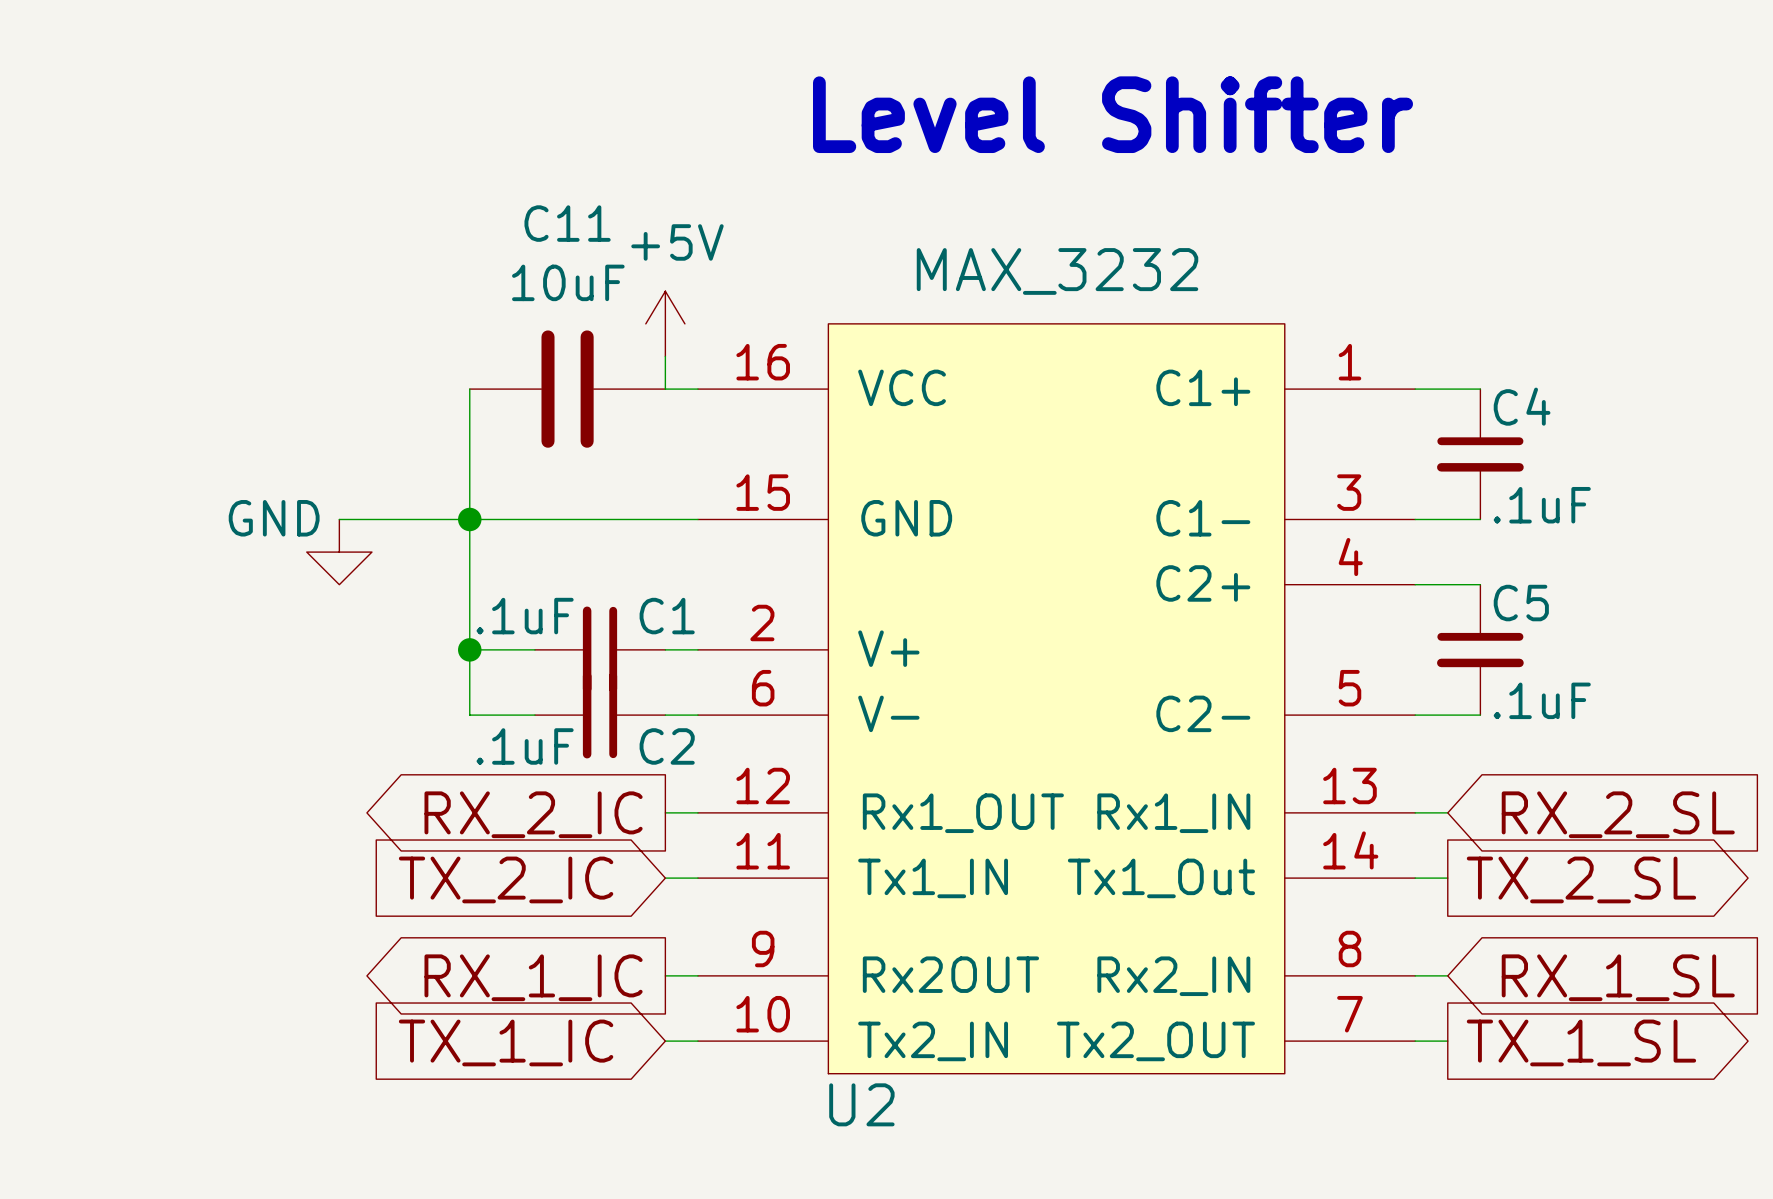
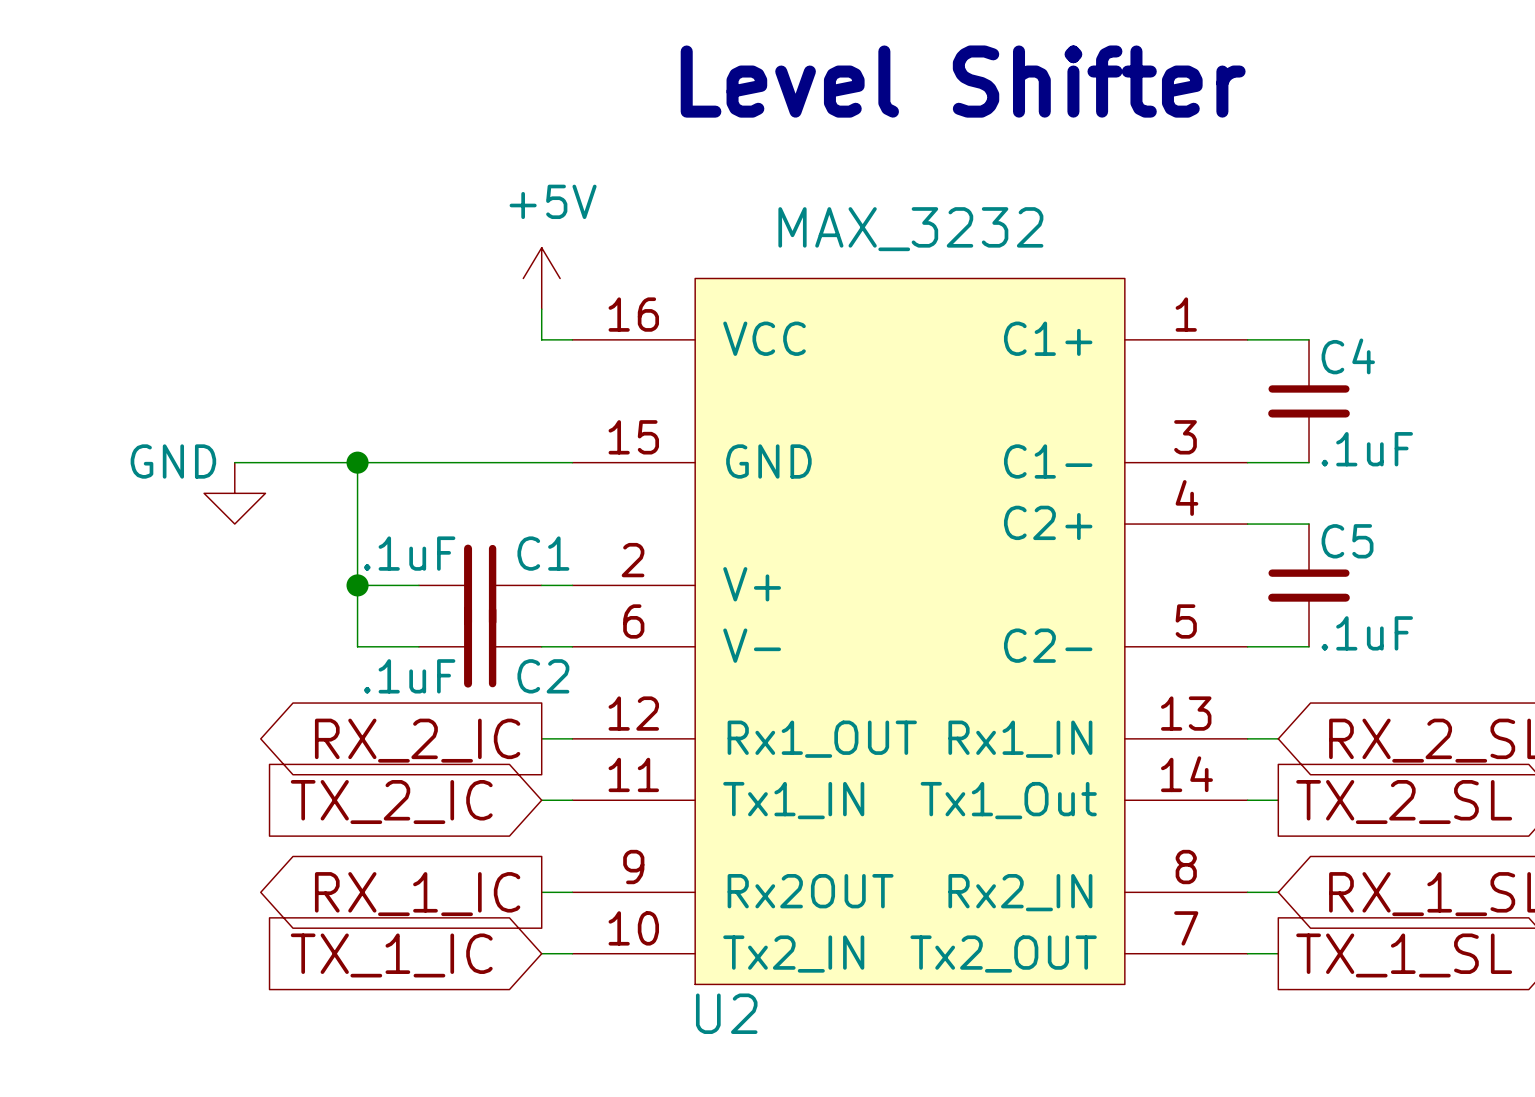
wire: (469, 389) (469, 519) -> none
C11: 10uF (567, 389) -> none

